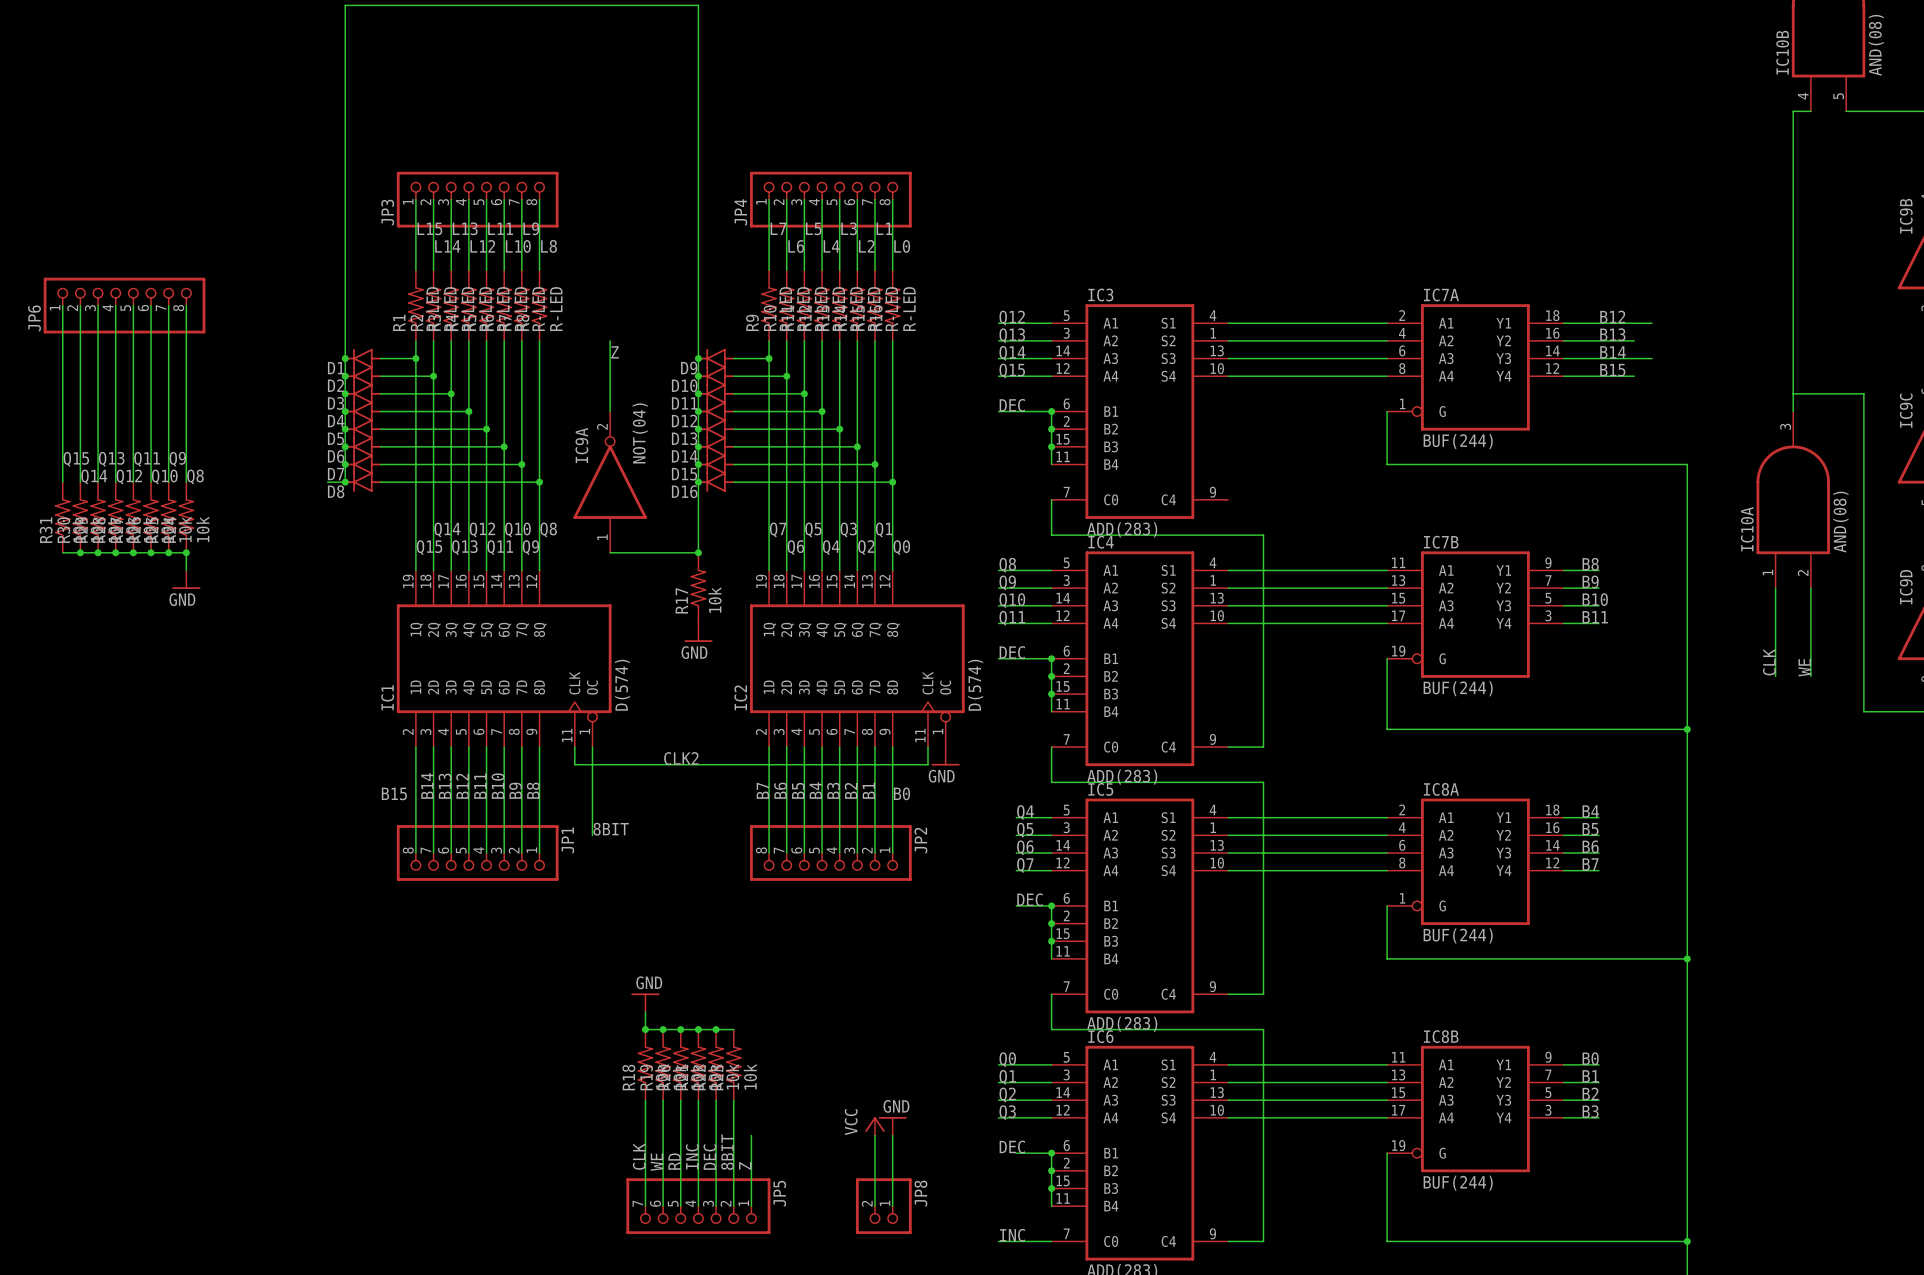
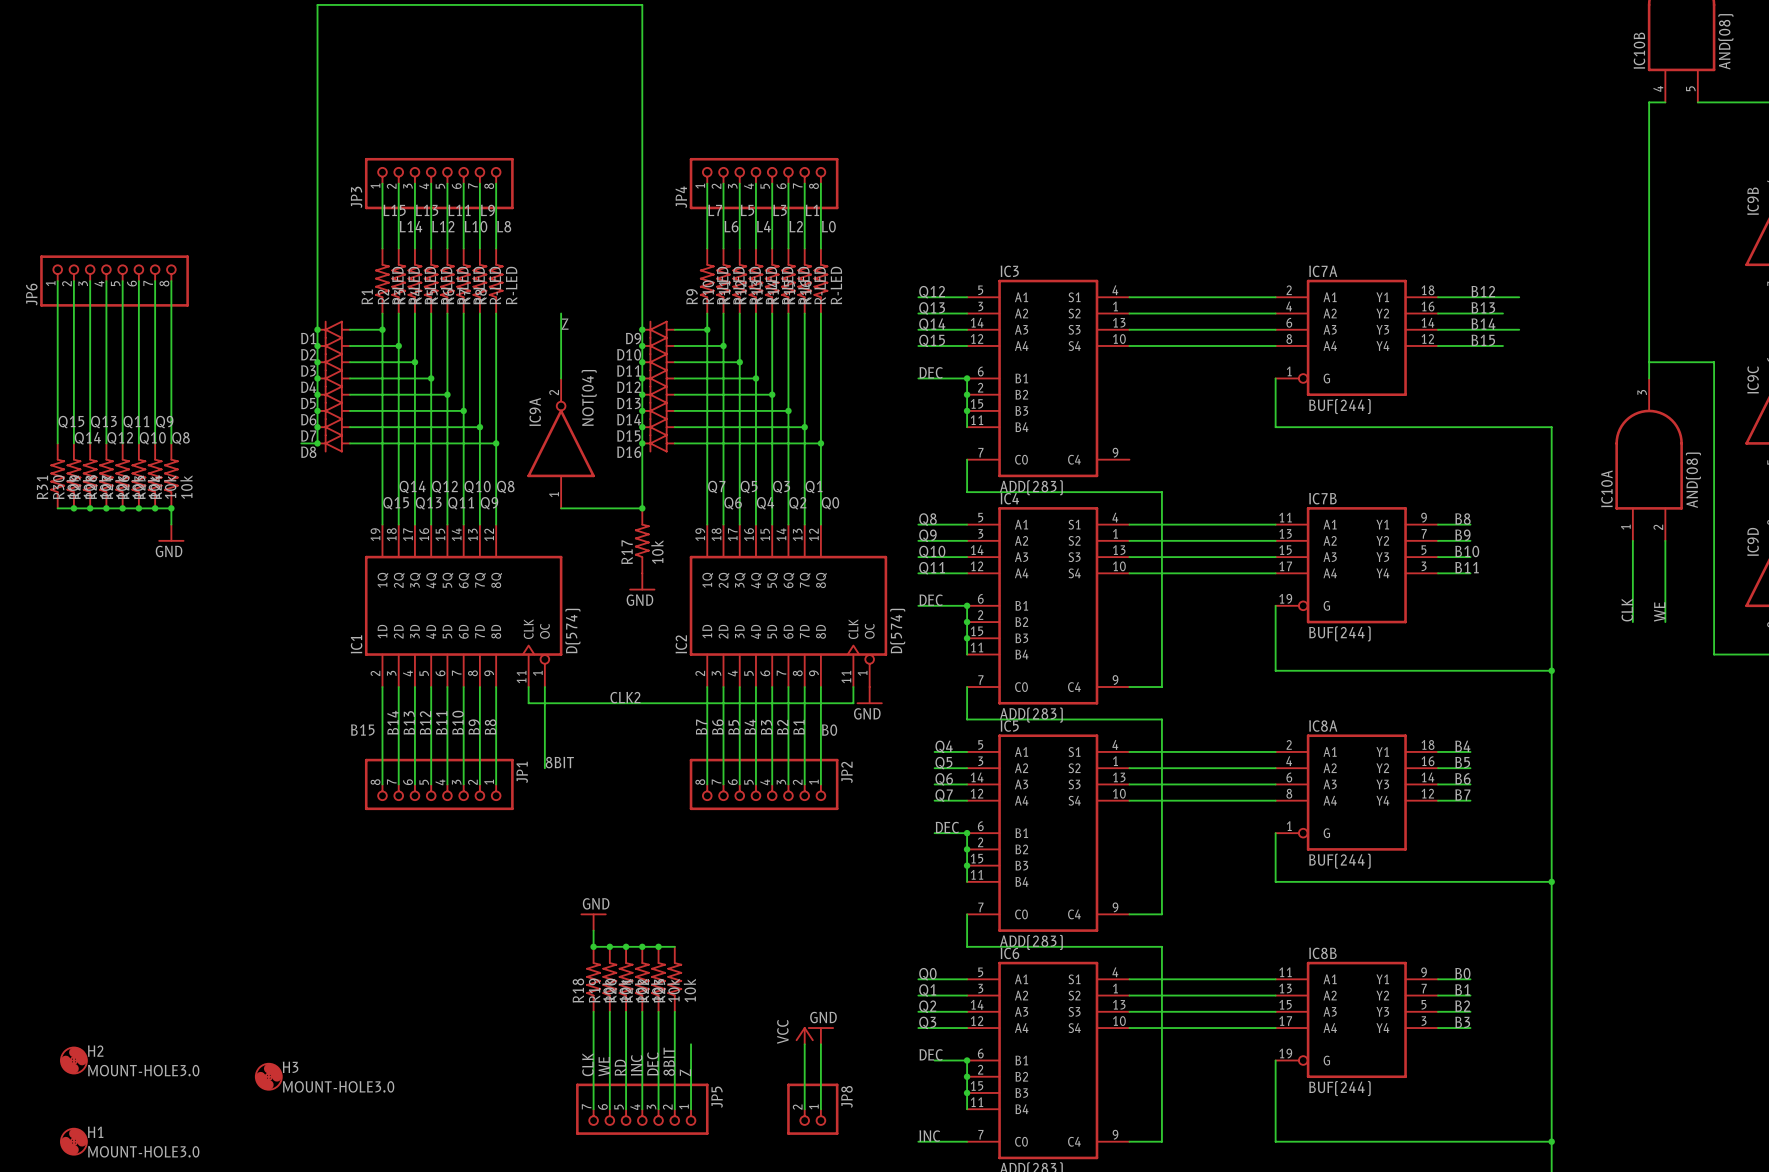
H2: none -> MOUNT-HOLE3.0 (73, 1060)
H3: none -> MOUNT-HOLE3.0 (268, 1076)
H1: none -> MOUNT-HOLE3.0 (73, 1141)

